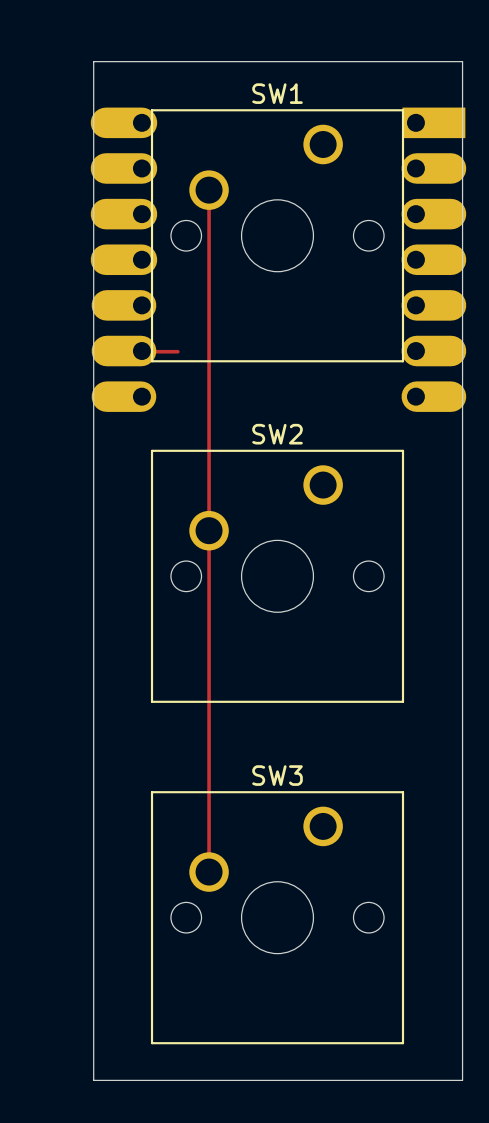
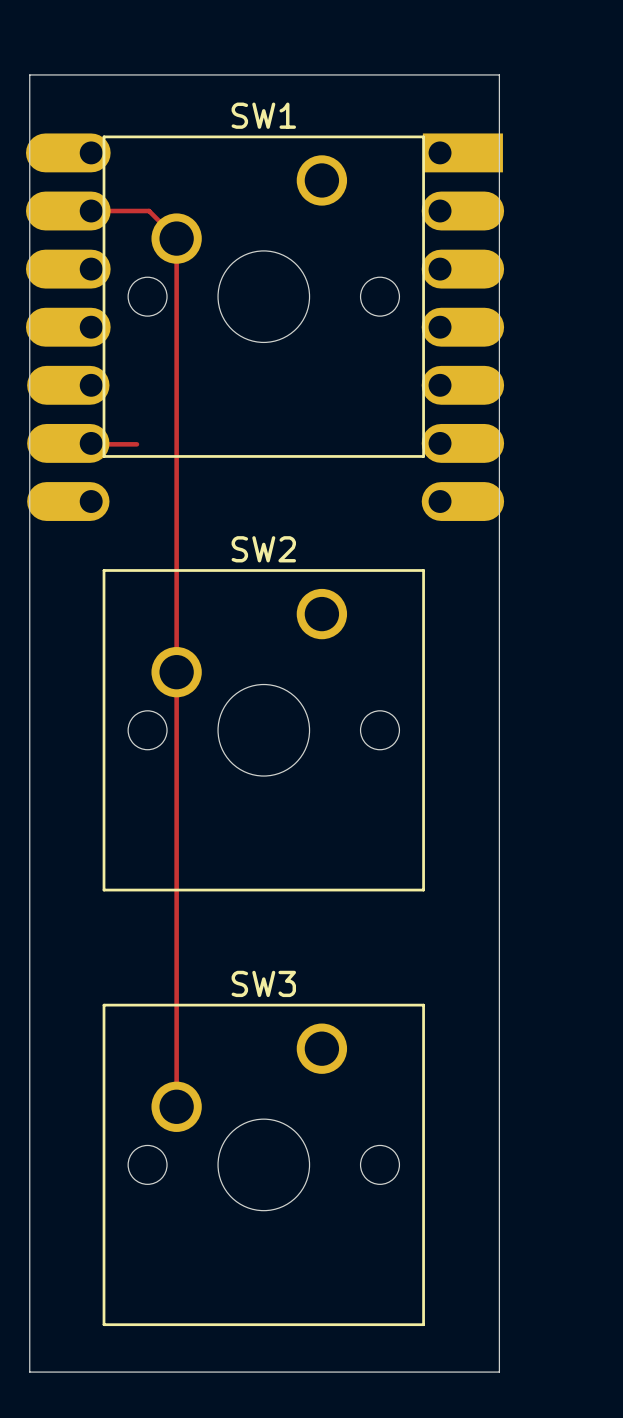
track: none -> (91, 211) (149, 211) (176, 238)

